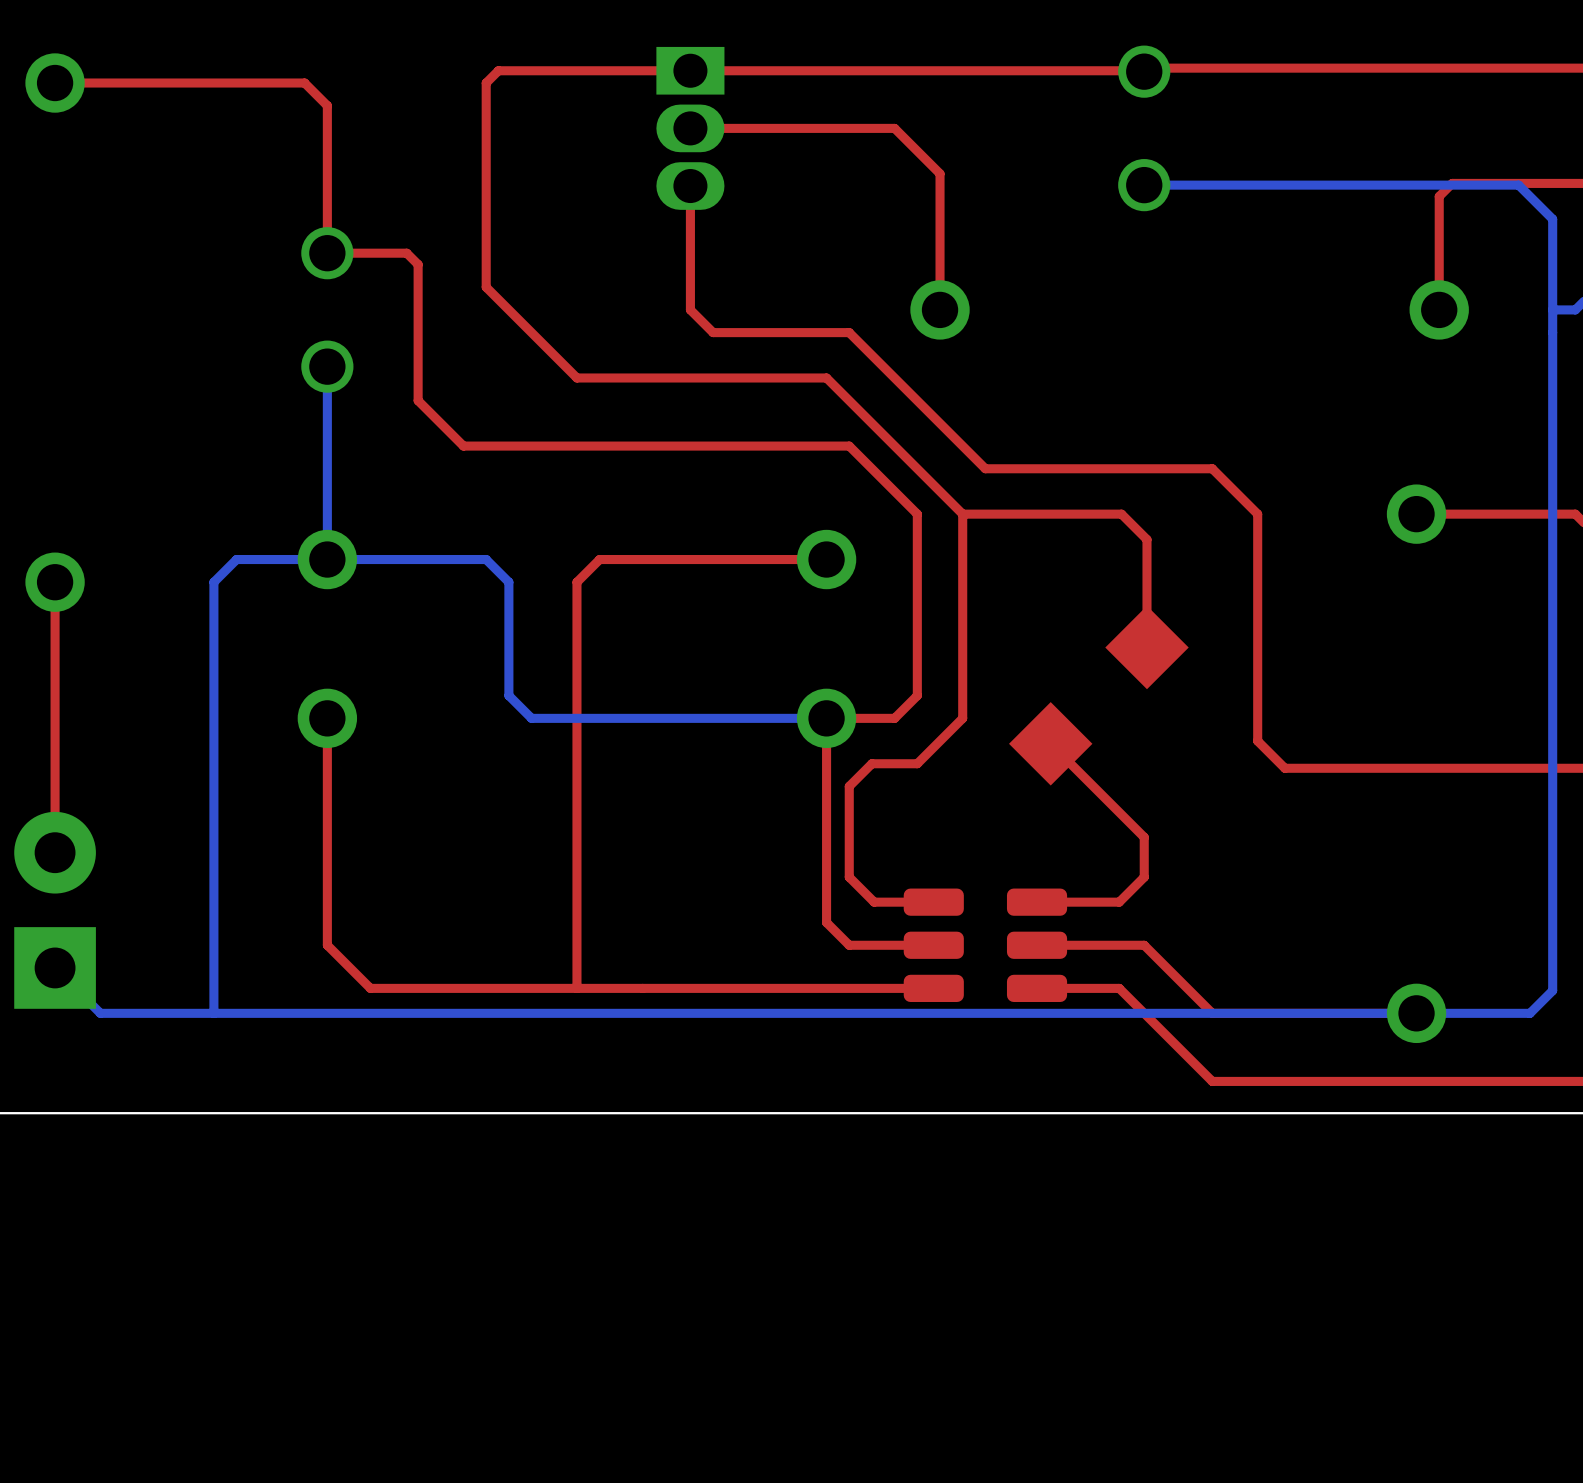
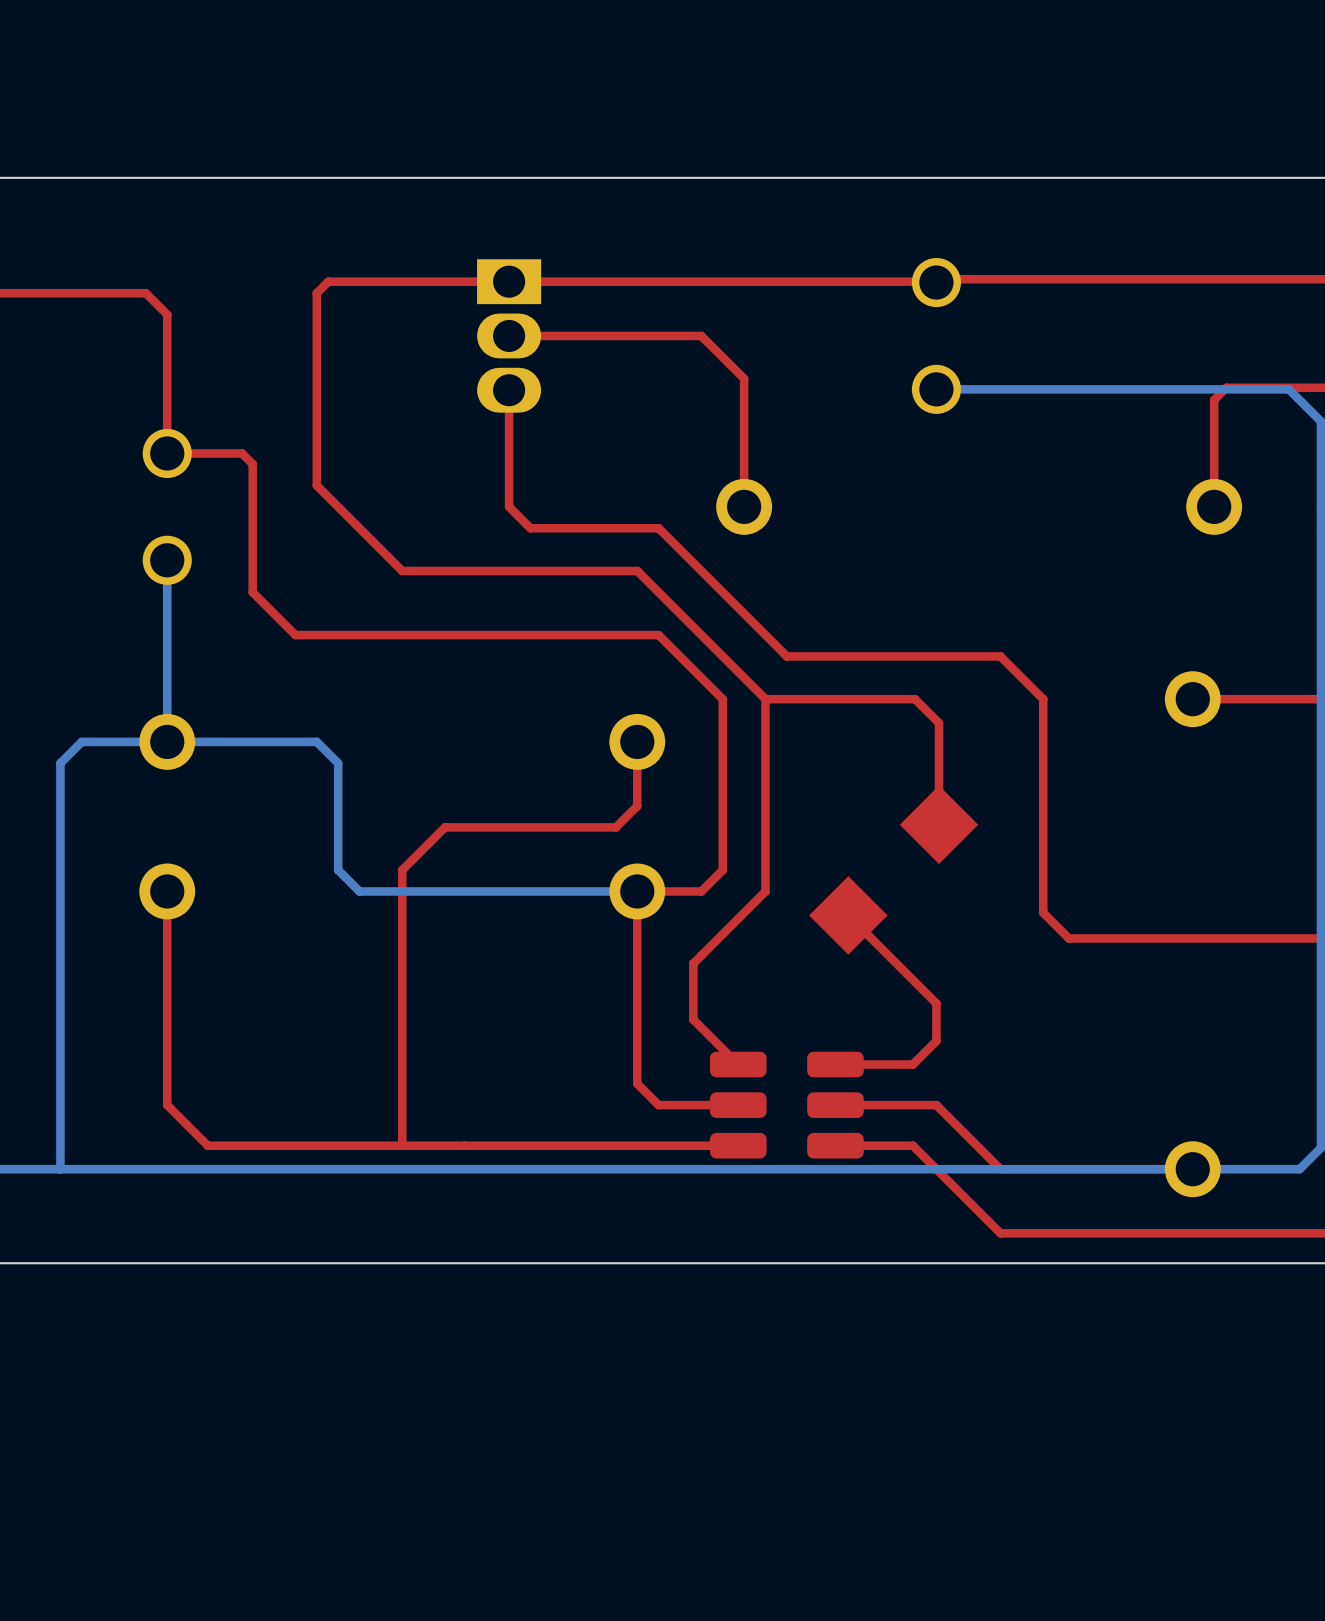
top track: (826, 559) (599, 559) (576, 582) (576, 695) -> (637, 741) (637, 806) (615, 827) (445, 827) (402, 870)
top track: (917, 763) (871, 763) (849, 786) (849, 877) (874, 902) (933, 902) -> (722, 934) (693, 963) (693, 1019) (738, 1064)

